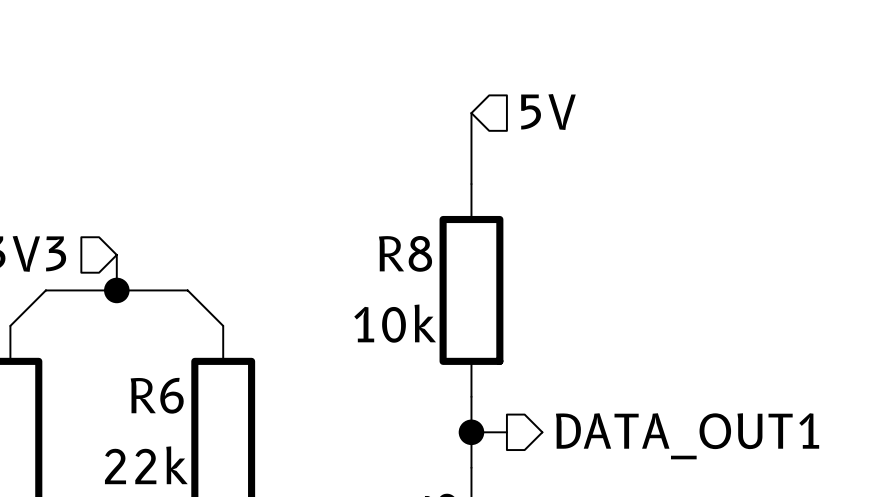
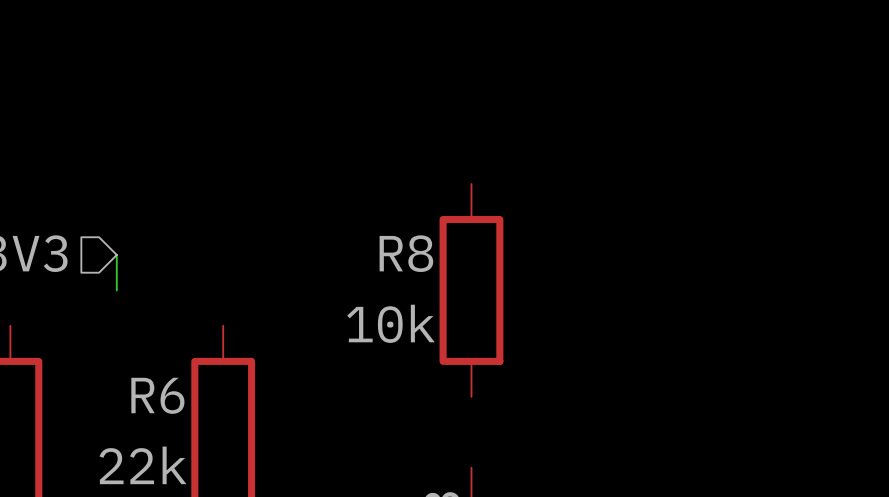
hierarchical label: 5V (548, 112) -> none
wire: (471, 113) (471, 184) -> none
junction: (116, 290) -> none
wire: (10, 325) (45, 290) (187, 290) (223, 325) -> none
wire: (471, 396) (471, 467) -> none
wire: (471, 432) (506, 432) -> none
junction: (471, 432) -> none
hierarchical label: DATA_OUT1 (687, 436) -> none

